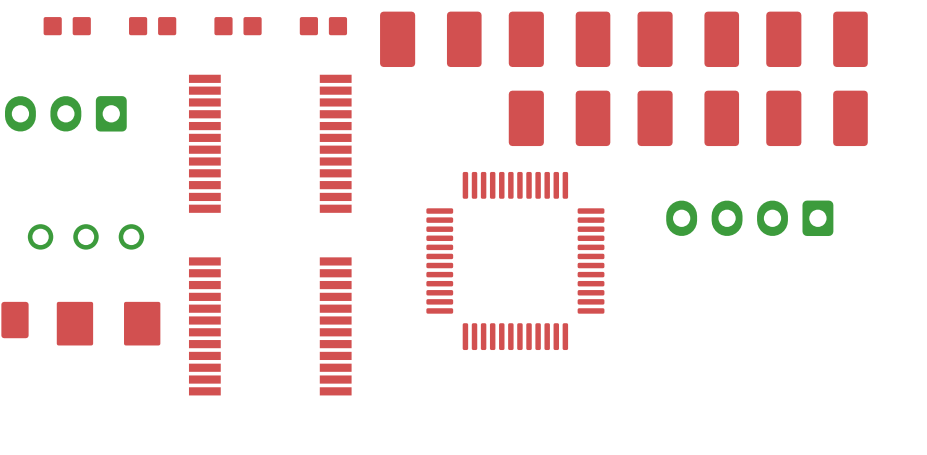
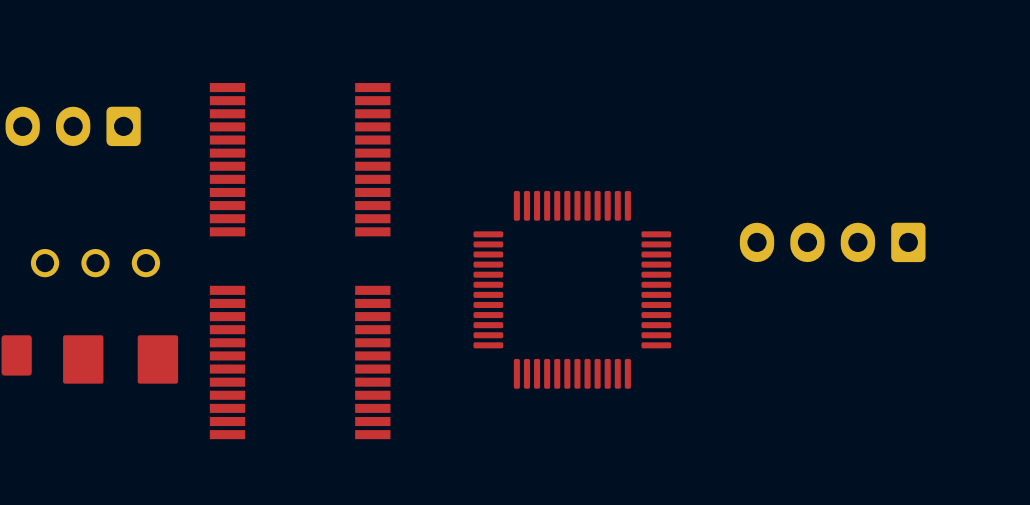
part: (67, 26) -> none
part: (152, 26) -> none
part: (238, 26) -> none
part: (323, 26) -> none
part: (430, 39) -> none
part: (559, 39) -> none
part: (688, 39) -> none
part: (817, 39) -> none
part: (559, 118) -> none
part: (688, 118) -> none
part: (817, 118) -> none

